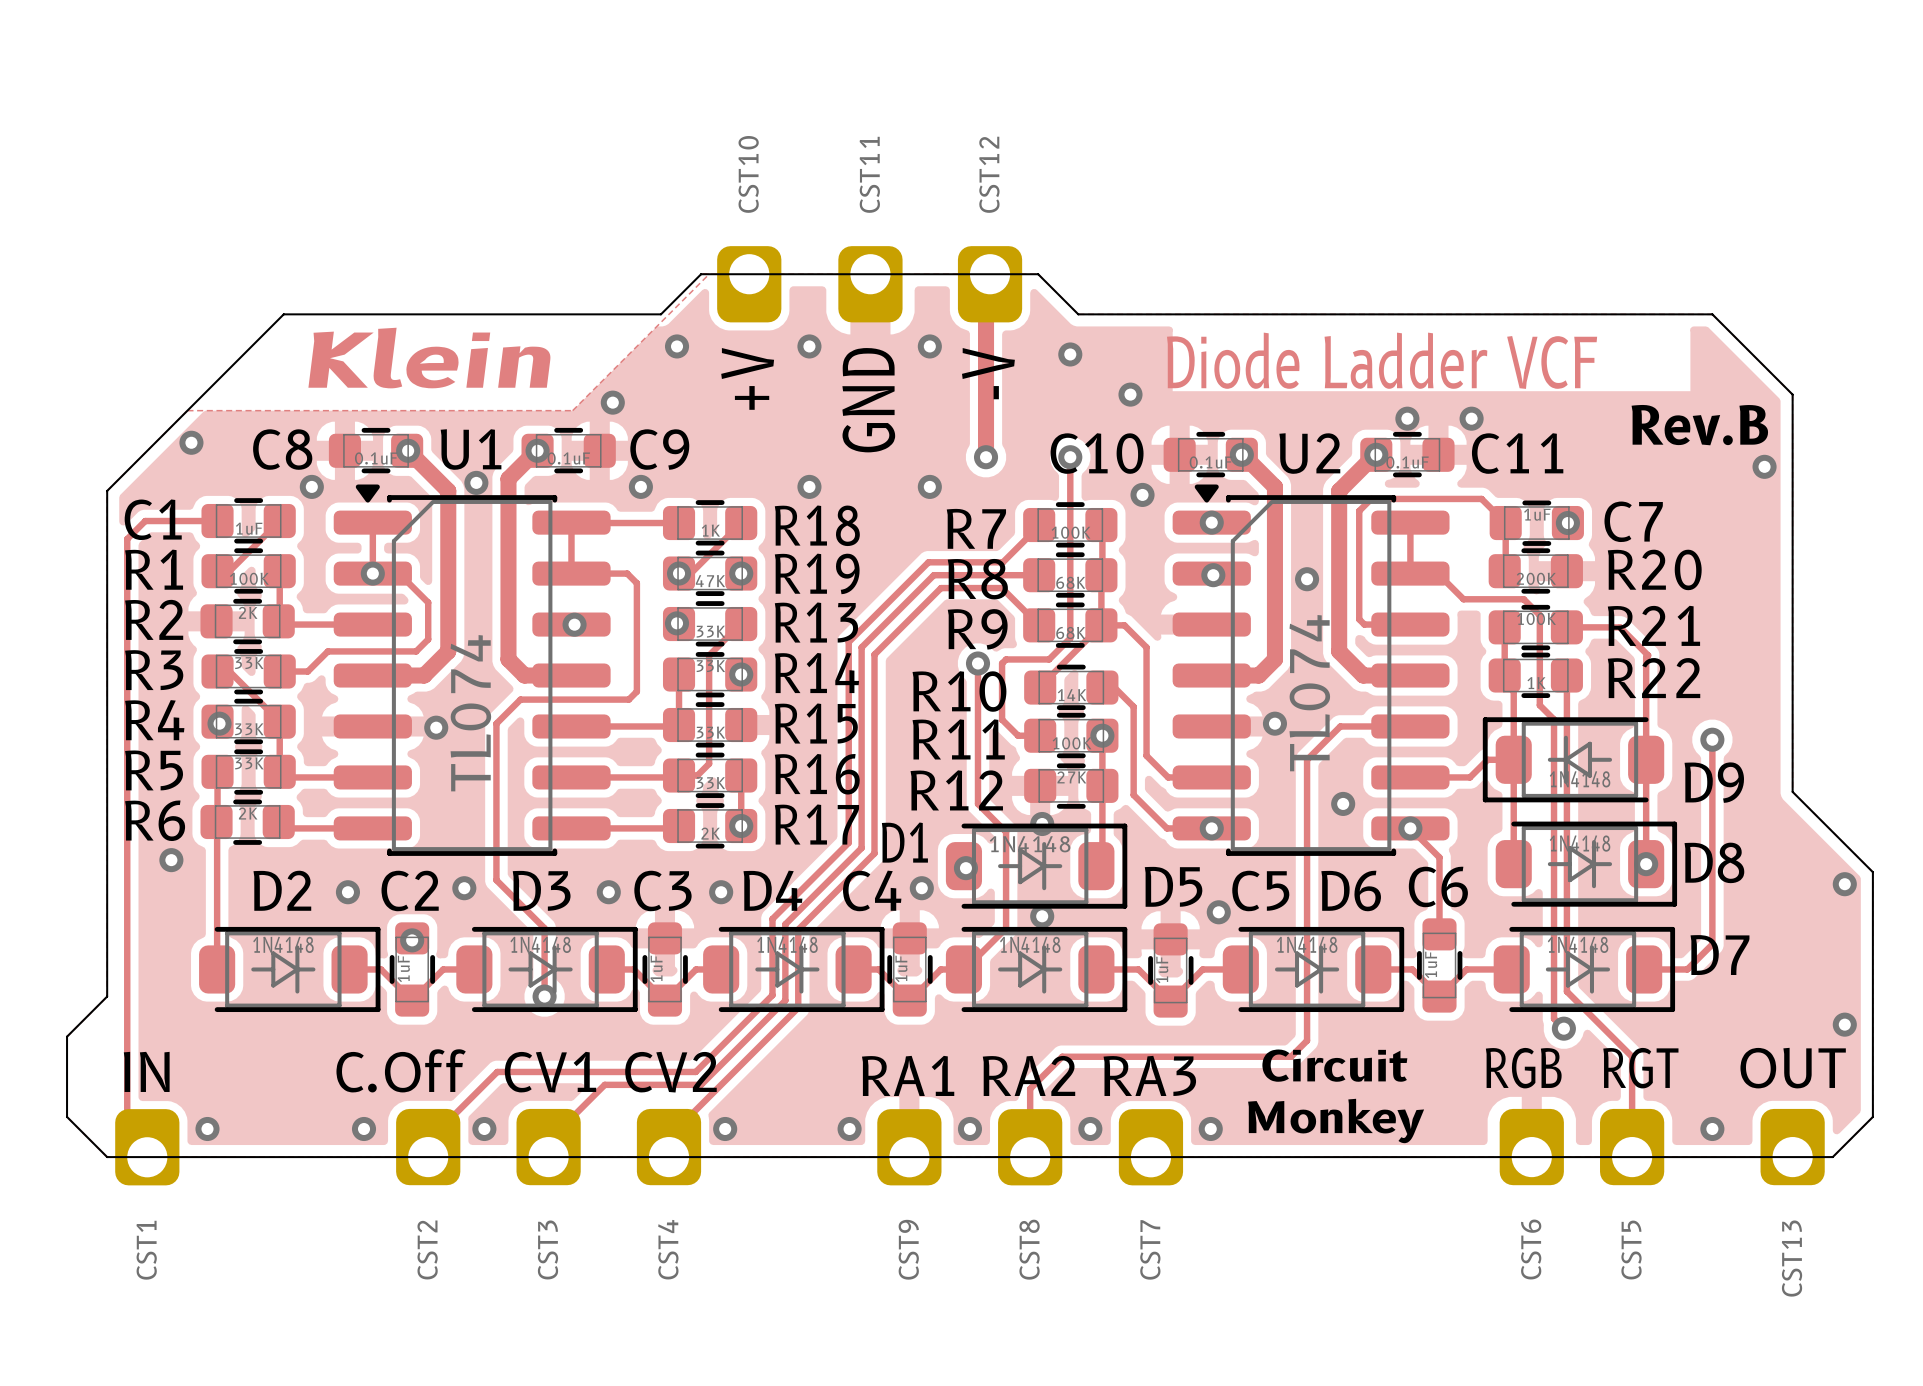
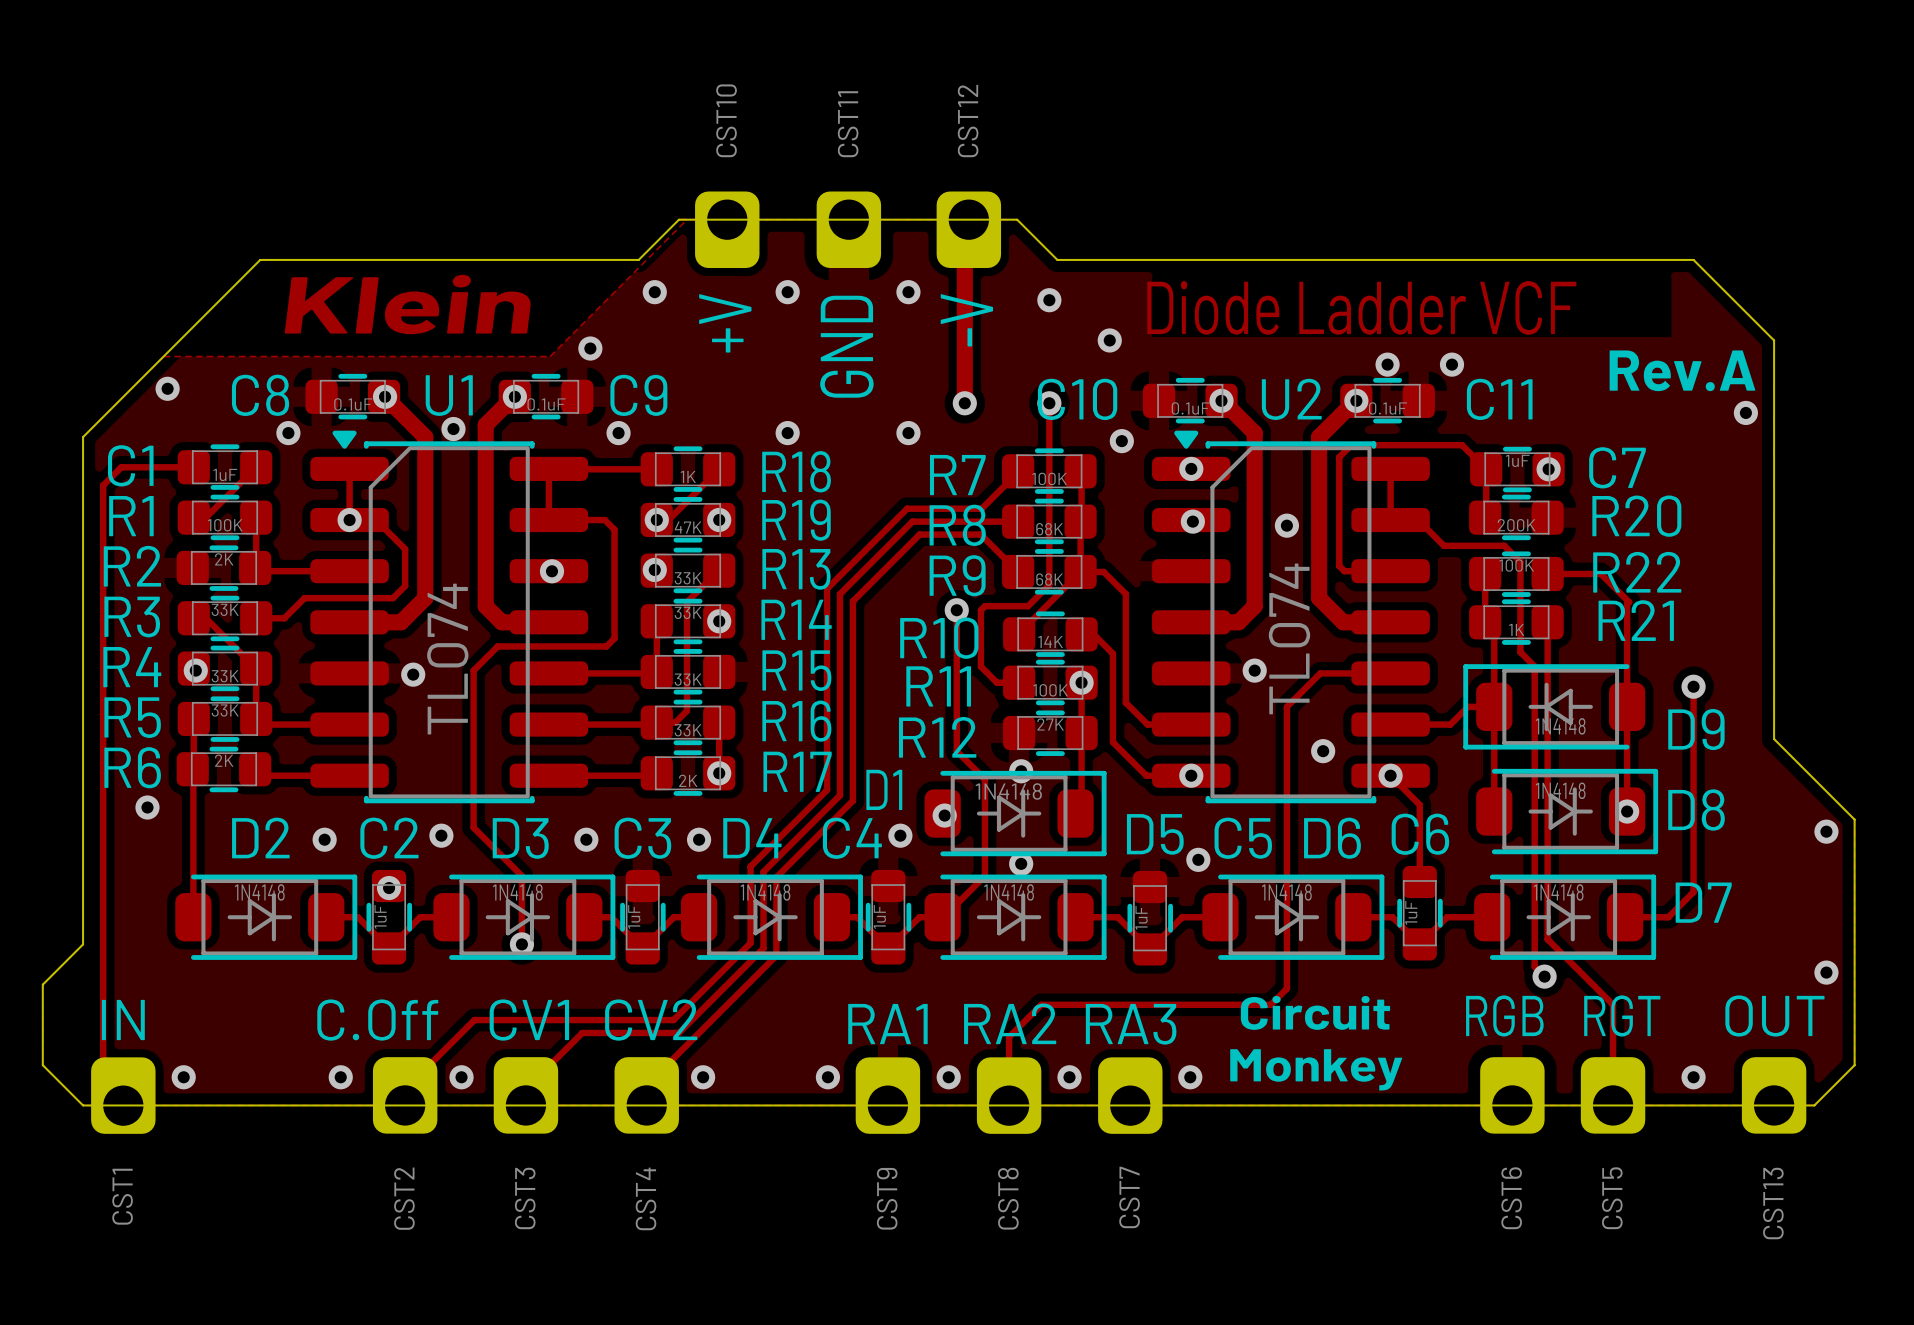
text: Rev.B (1699, 425) -> Rev.A (1682, 370)
R21 name position: R21 (1653, 625) -> R21 (1636, 620)
R22 name position: R22 (1654, 678) -> R22 (1637, 572)

